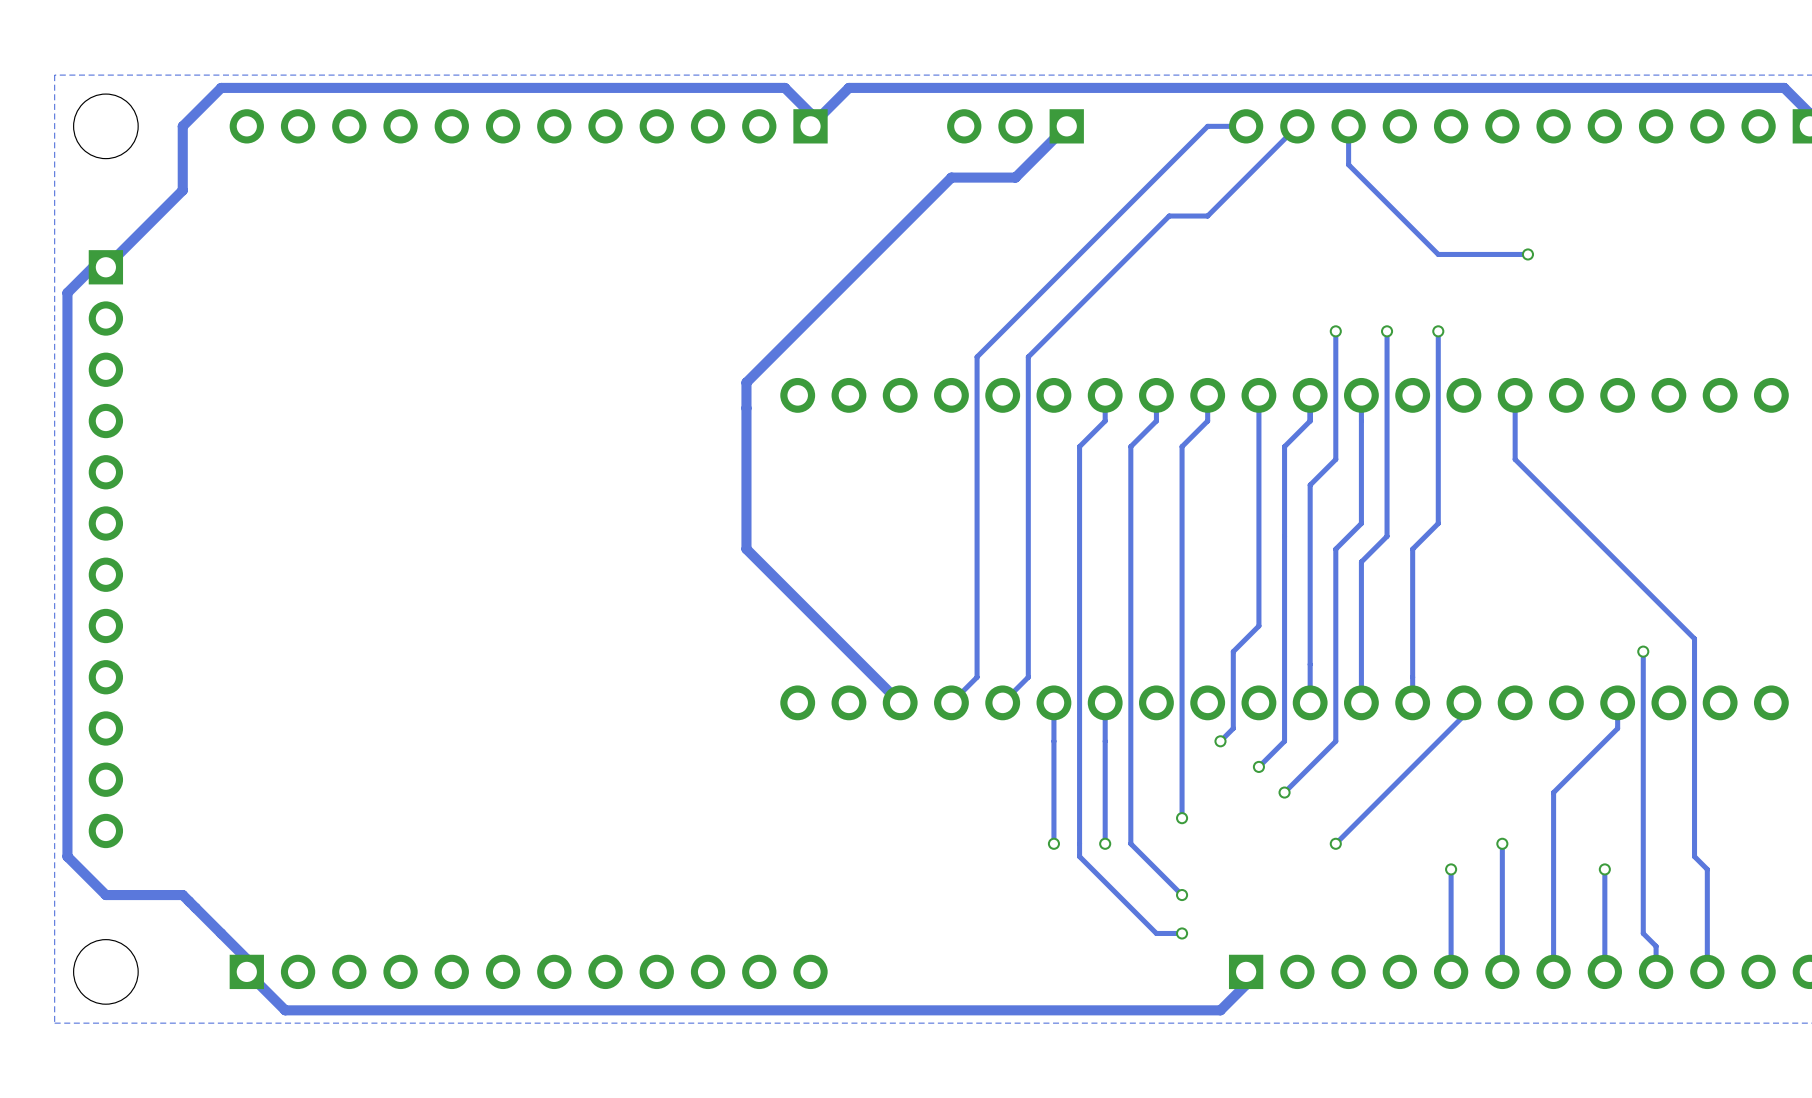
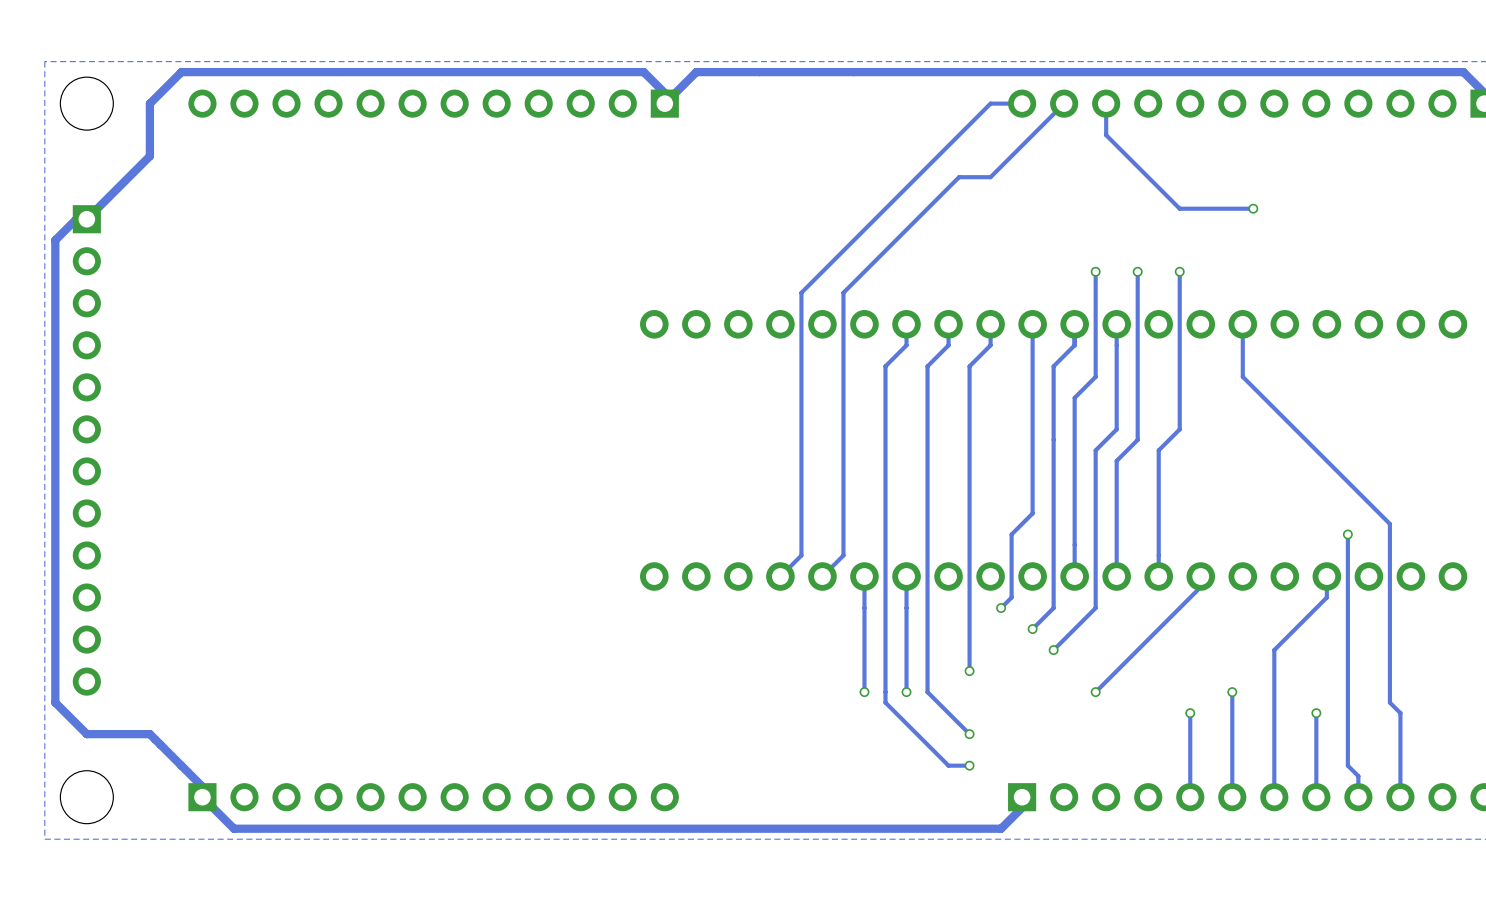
part: (1015, 126) -> none
track: (1066, 126) (1015, 177) (951, 177) (746, 382) (746, 549) (900, 702) -> none

